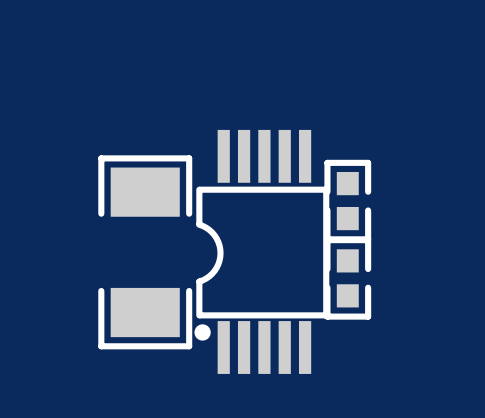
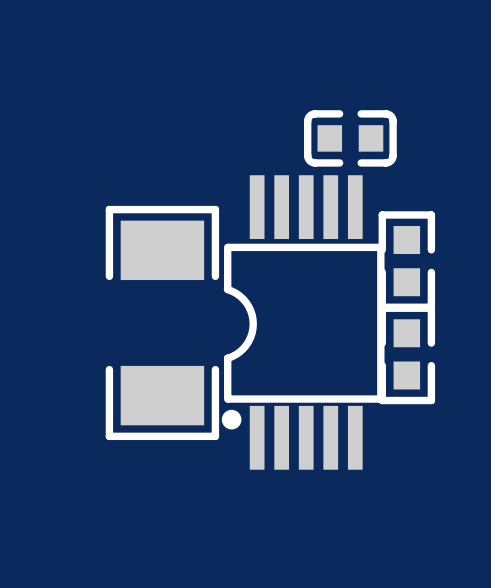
part: none -> (350, 138)

